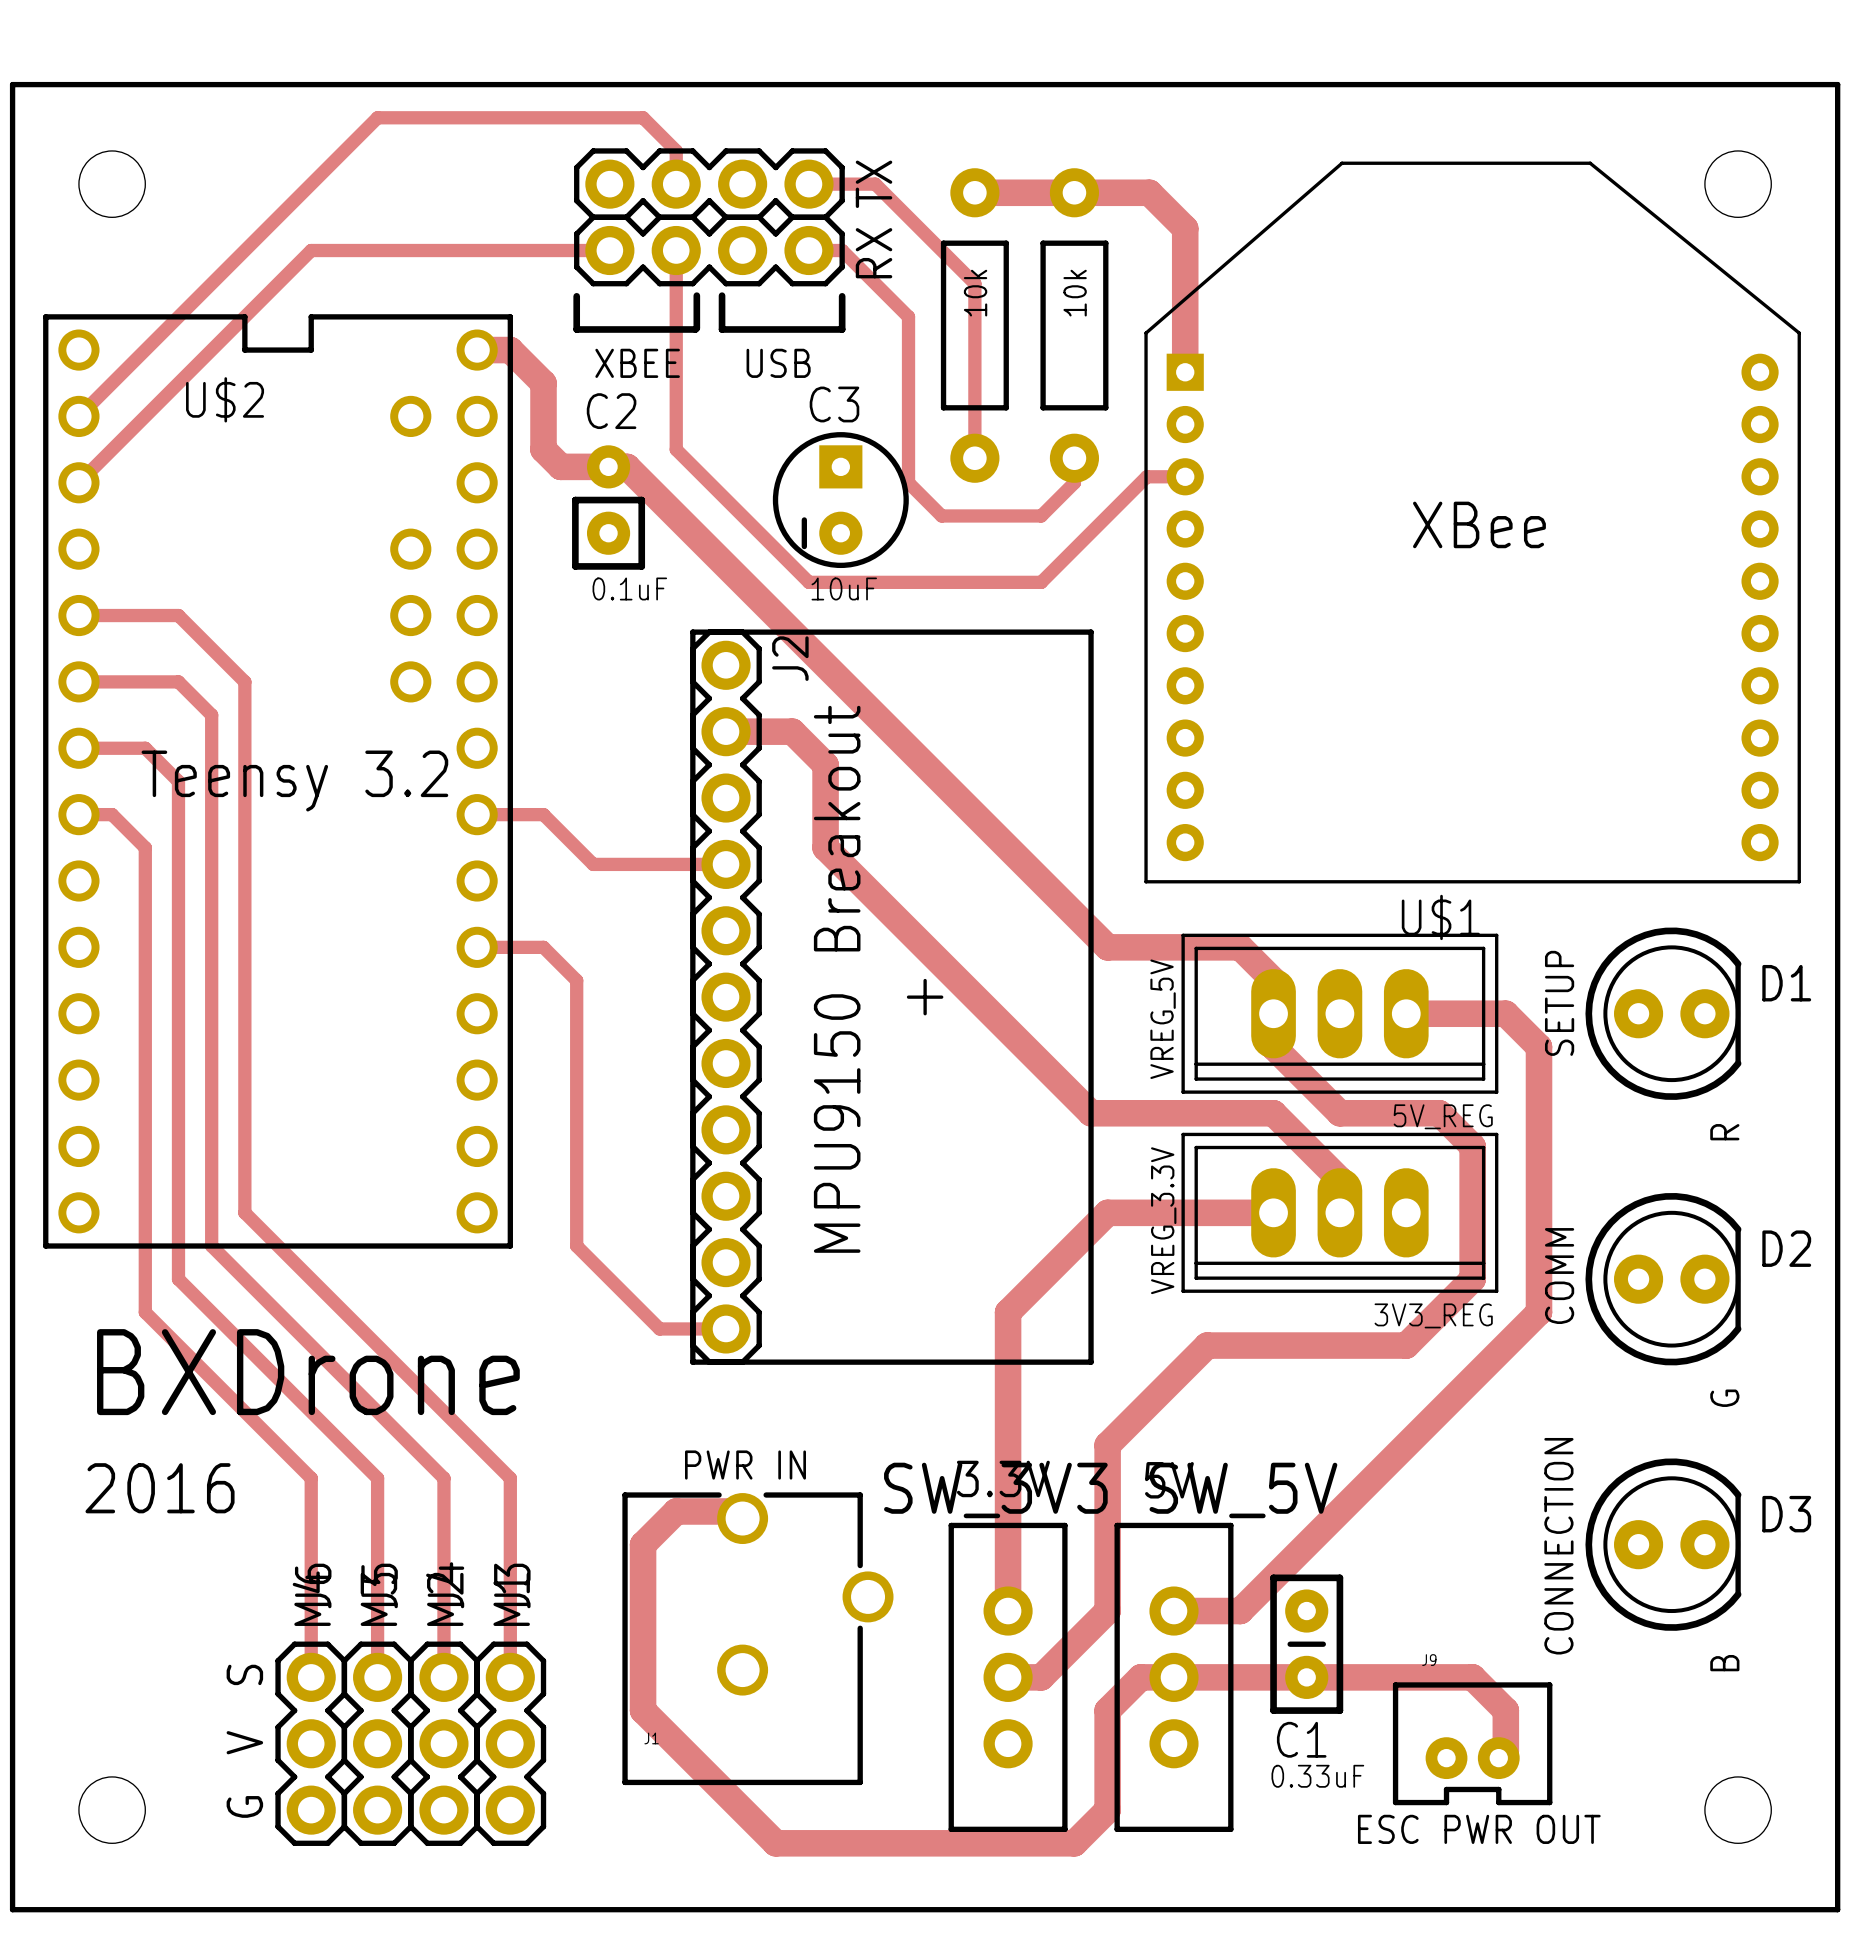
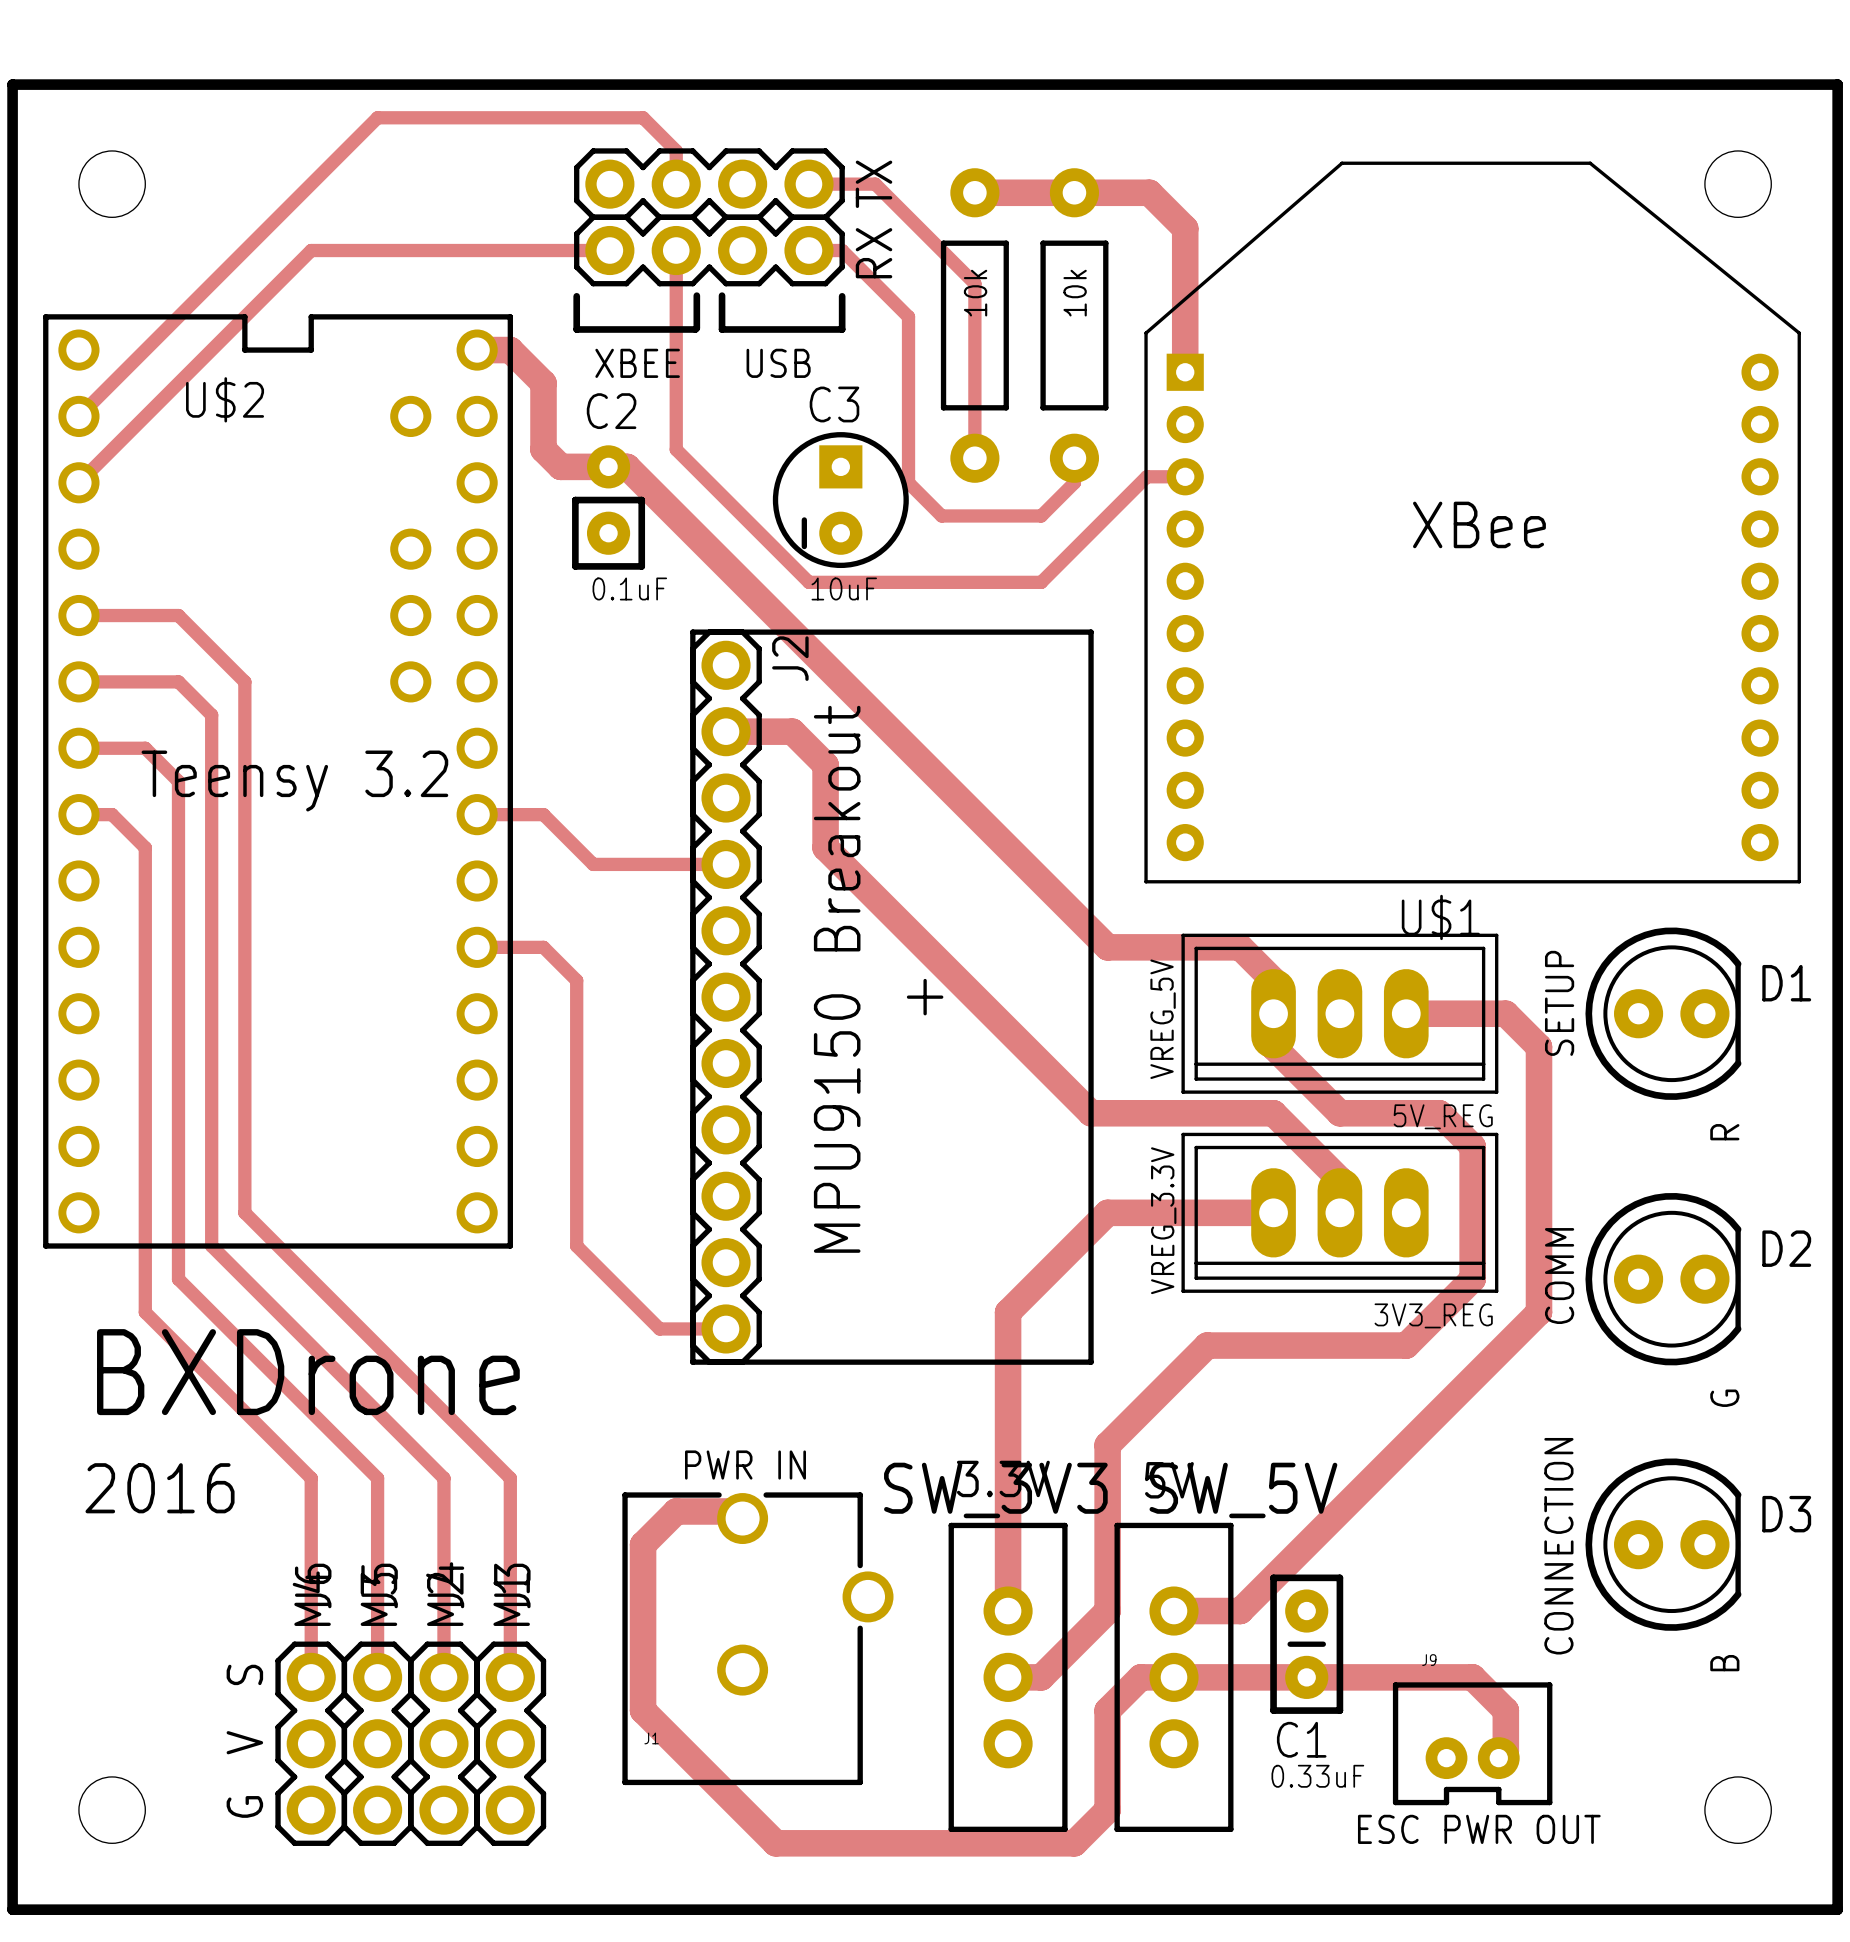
board edge width: thin (12, 84) (12, 1909) (1837, 1909) (1837, 84) (12, 84) -> thick (12, 84) (12, 1909) (1837, 1909) (1837, 84) (12, 84)

